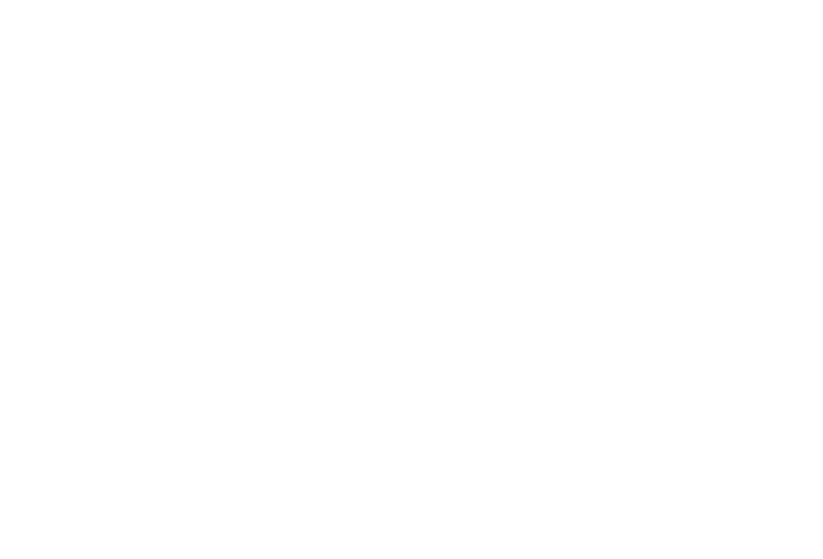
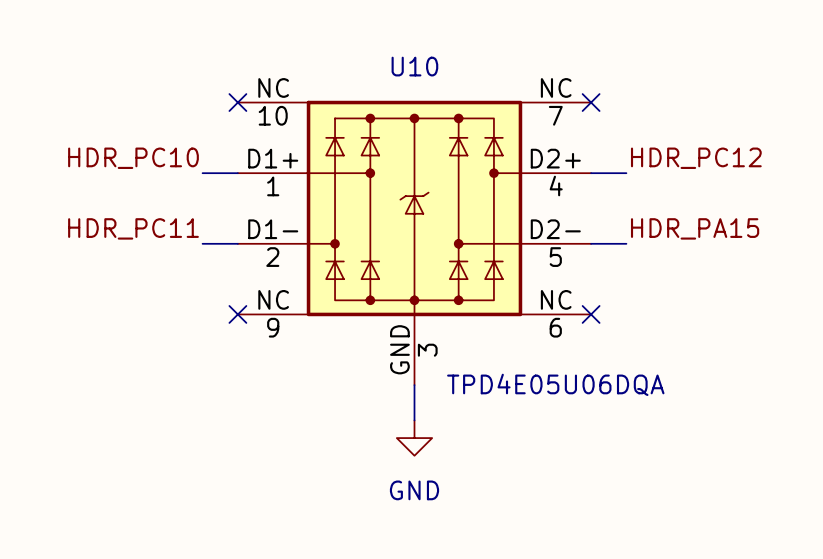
no-connect mark: none -> (237, 102)
no-connect mark: none -> (591, 102)
label: none -> HDR_PC10 (133, 158)
label: none -> HDR_PC12 (696, 158)
wire: none -> (202, 173) (237, 173)
wire: none -> (591, 173) (626, 173)
label: none -> HDR_PC11 (133, 228)
label: none -> HDR_PA15 (695, 228)
U10: none -> TPD4E05U06DQA (414, 242)
wire: none -> (202, 243) (237, 243)
wire: none -> (591, 243) (626, 243)
no-connect mark: none -> (237, 314)
no-connect mark: none -> (591, 314)
wire: none -> (414, 385) (414, 420)
power symbol: none -> GND (414, 438)

